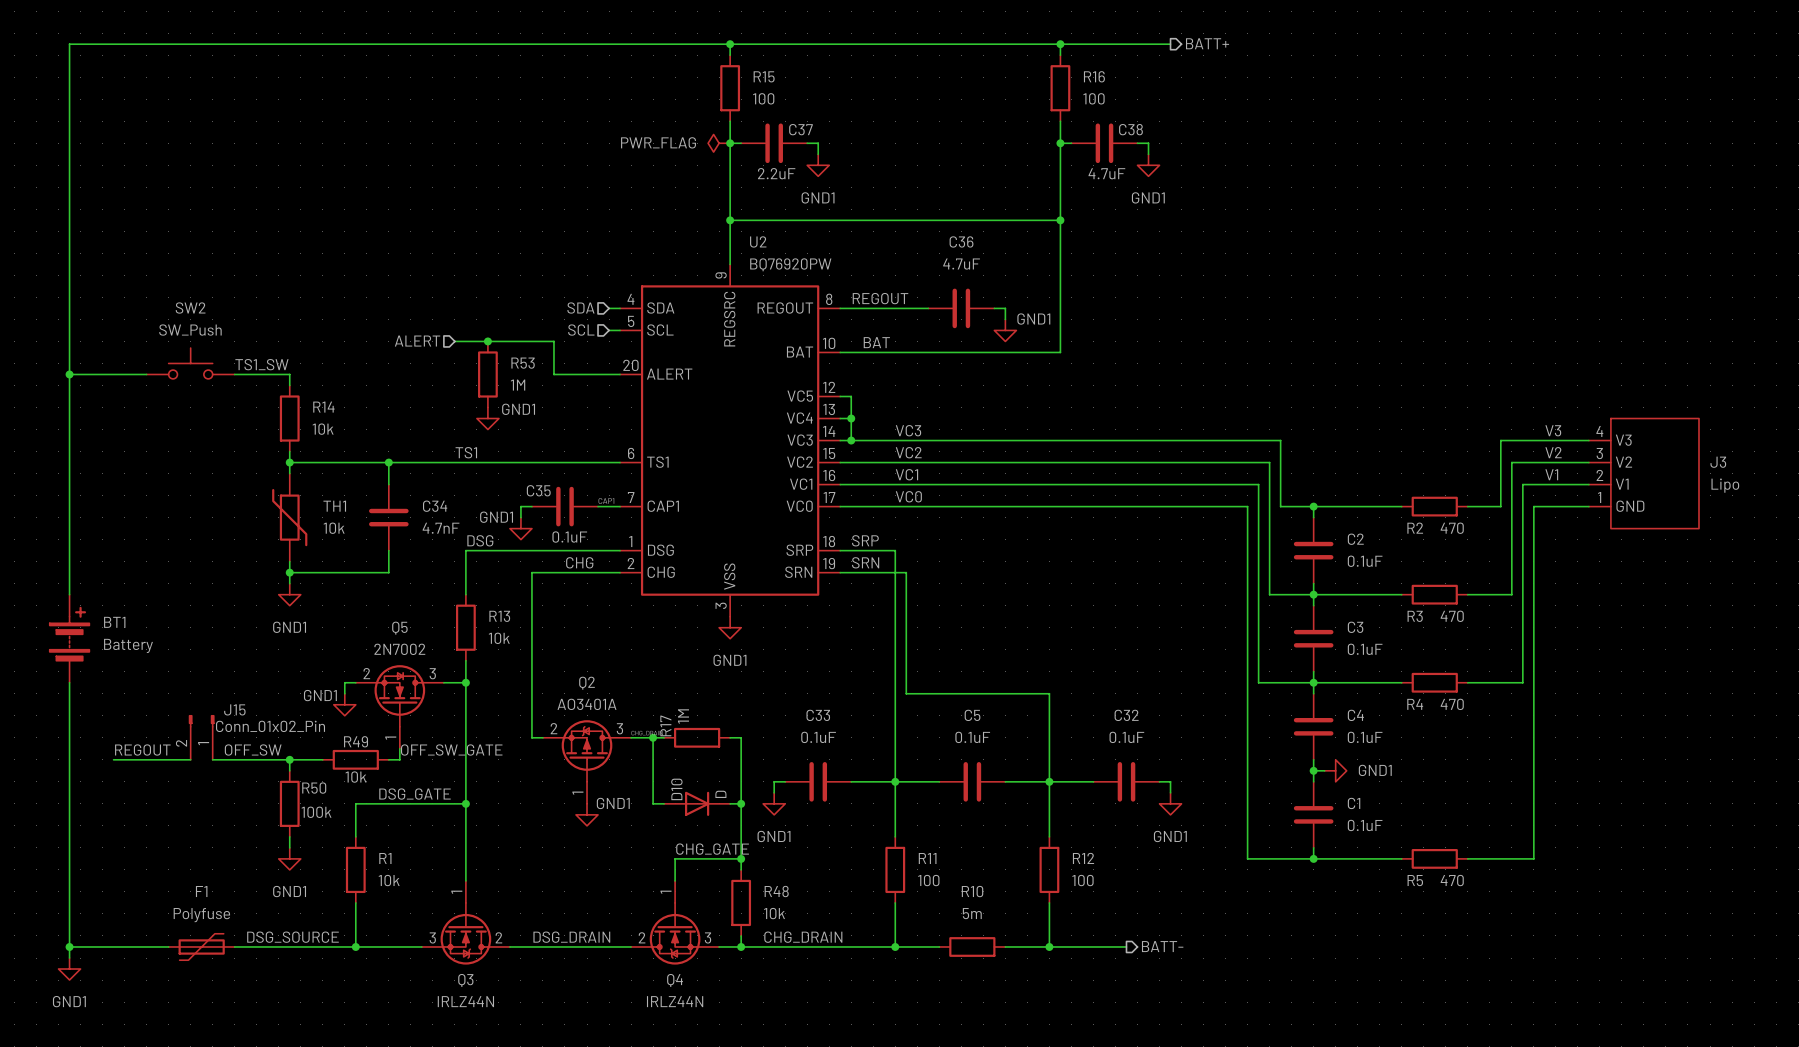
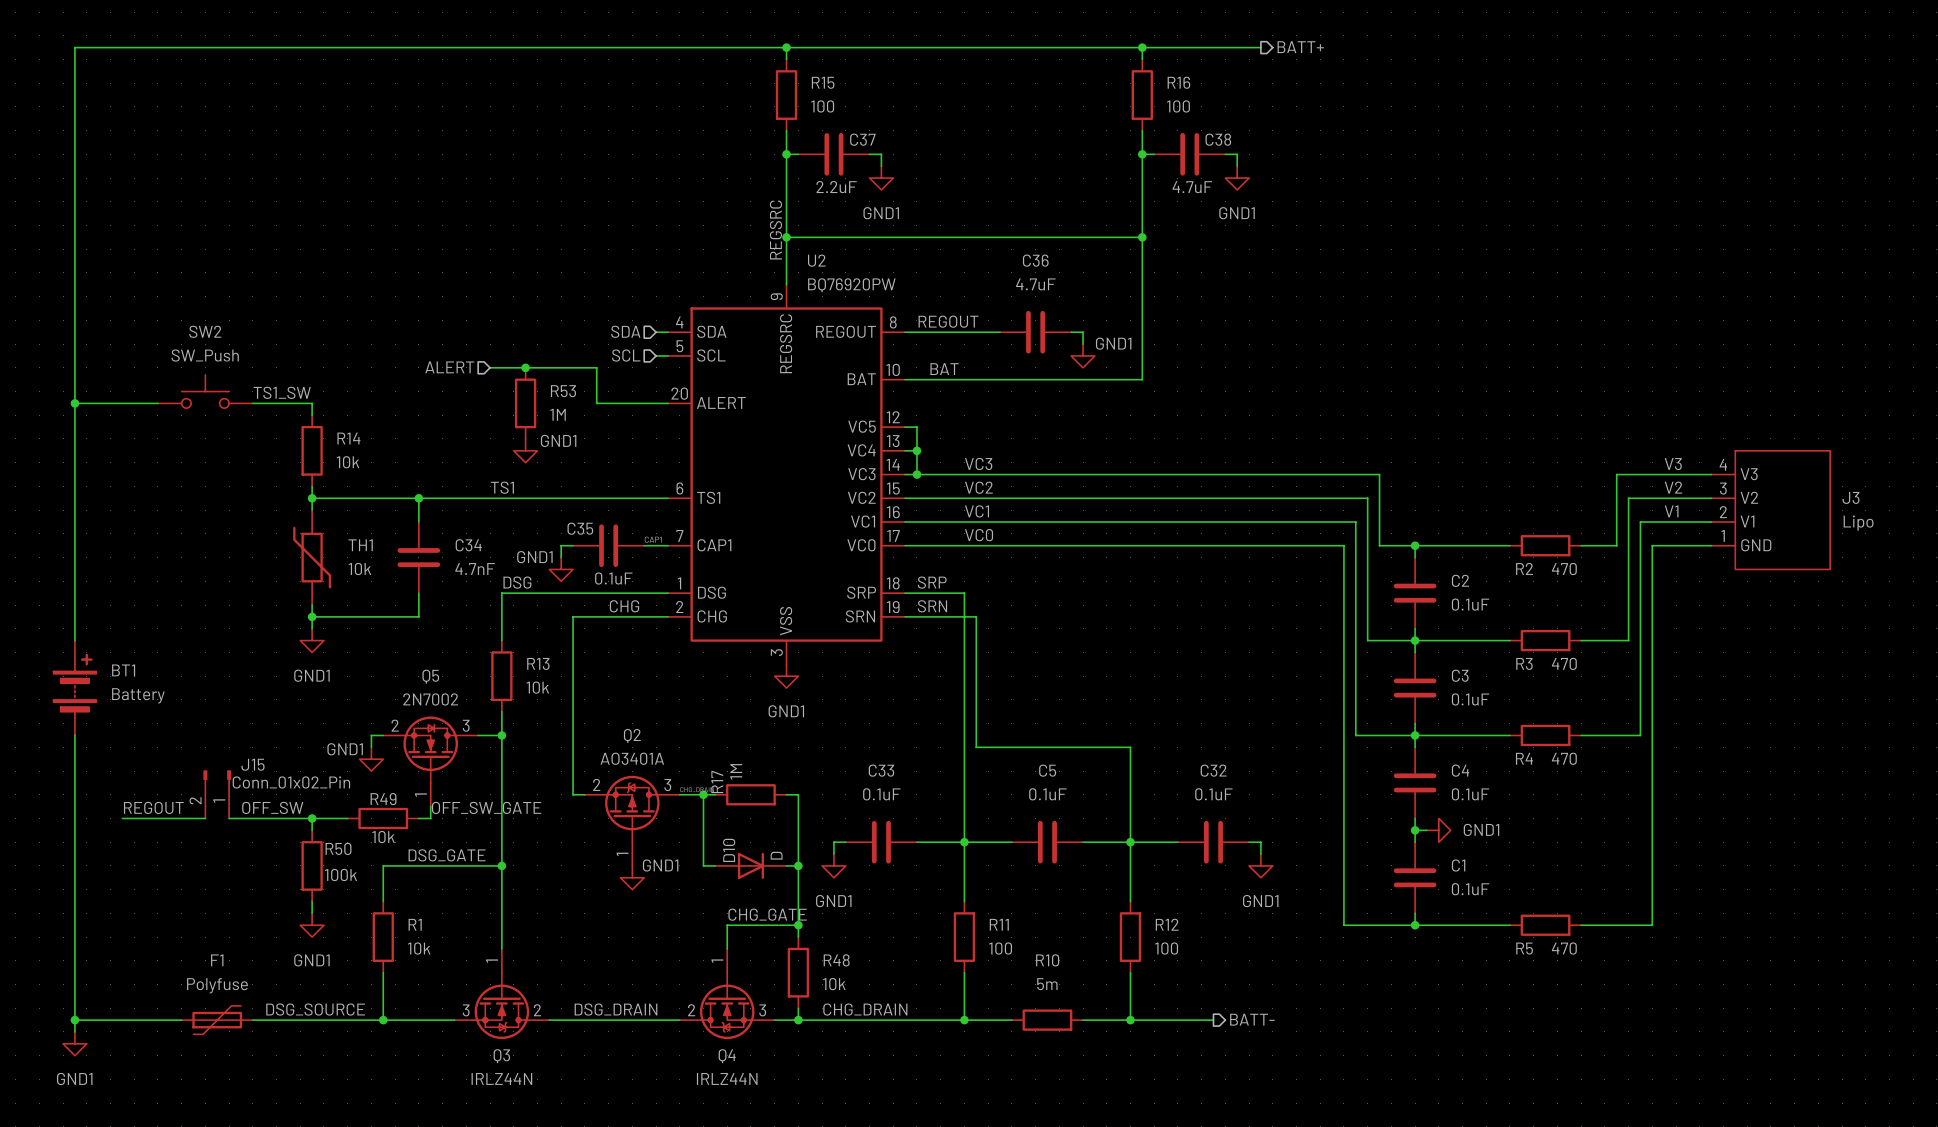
power symbol: PWR_FLAG (719, 143) -> none
label: none -> REGSRC (775, 230)

